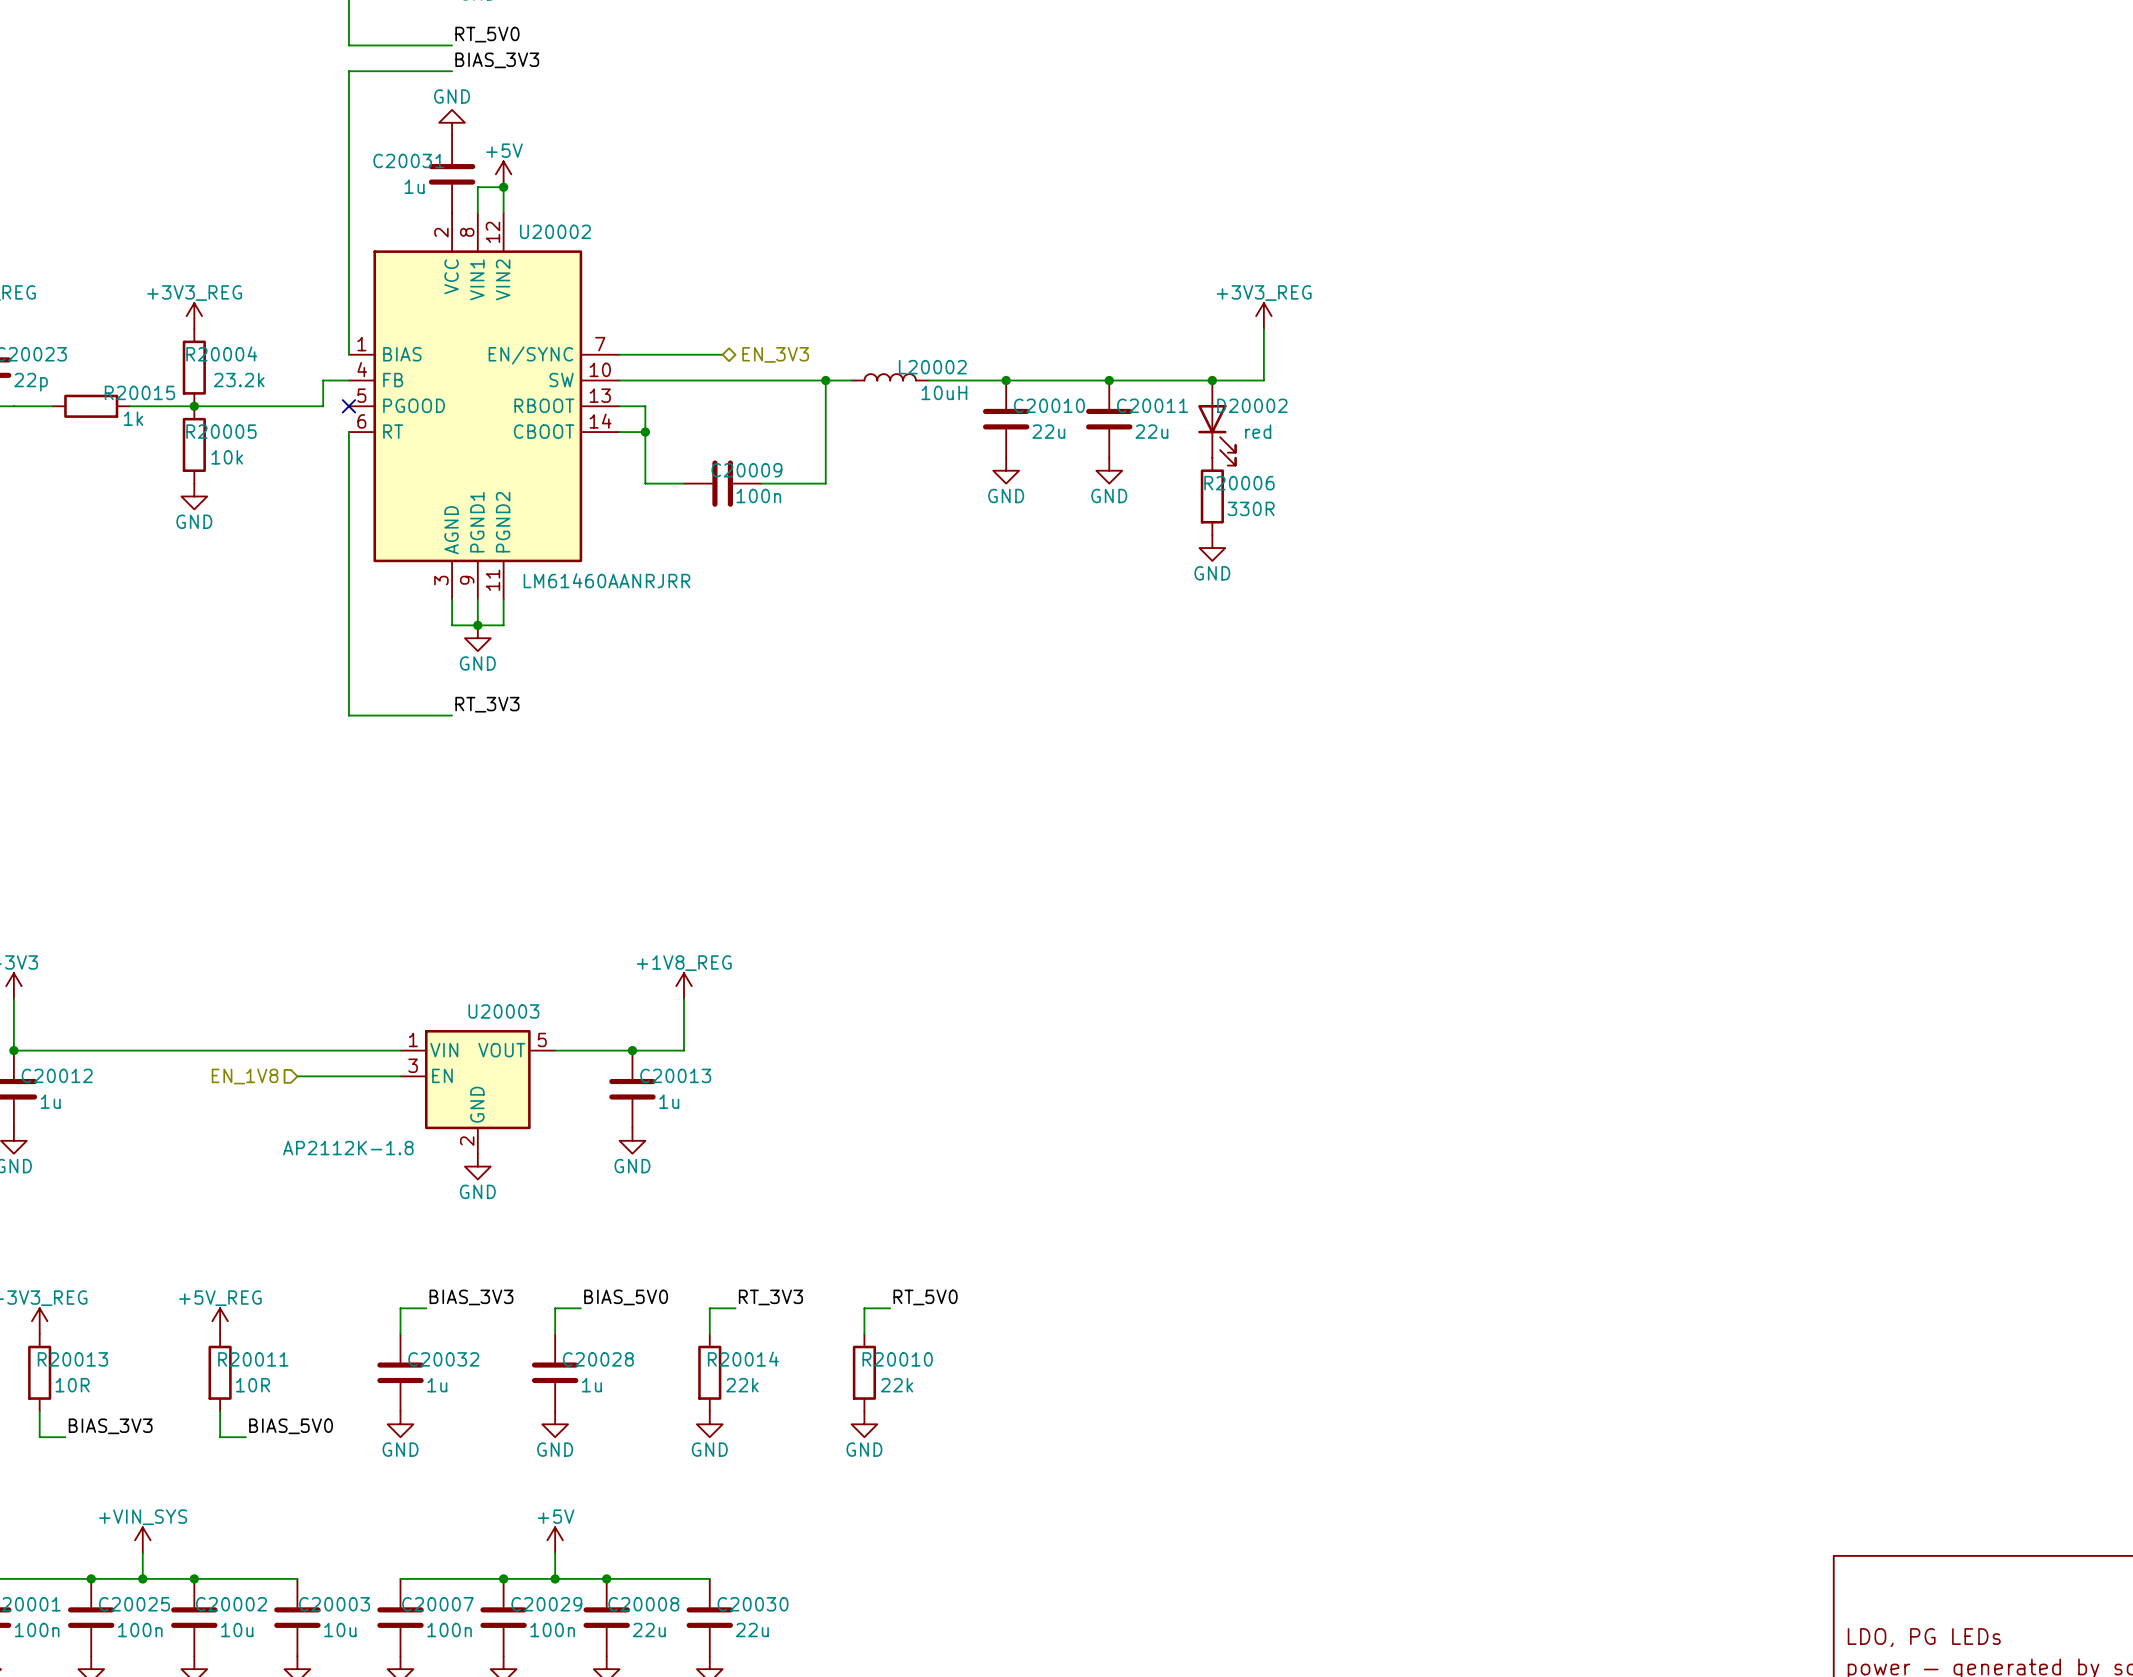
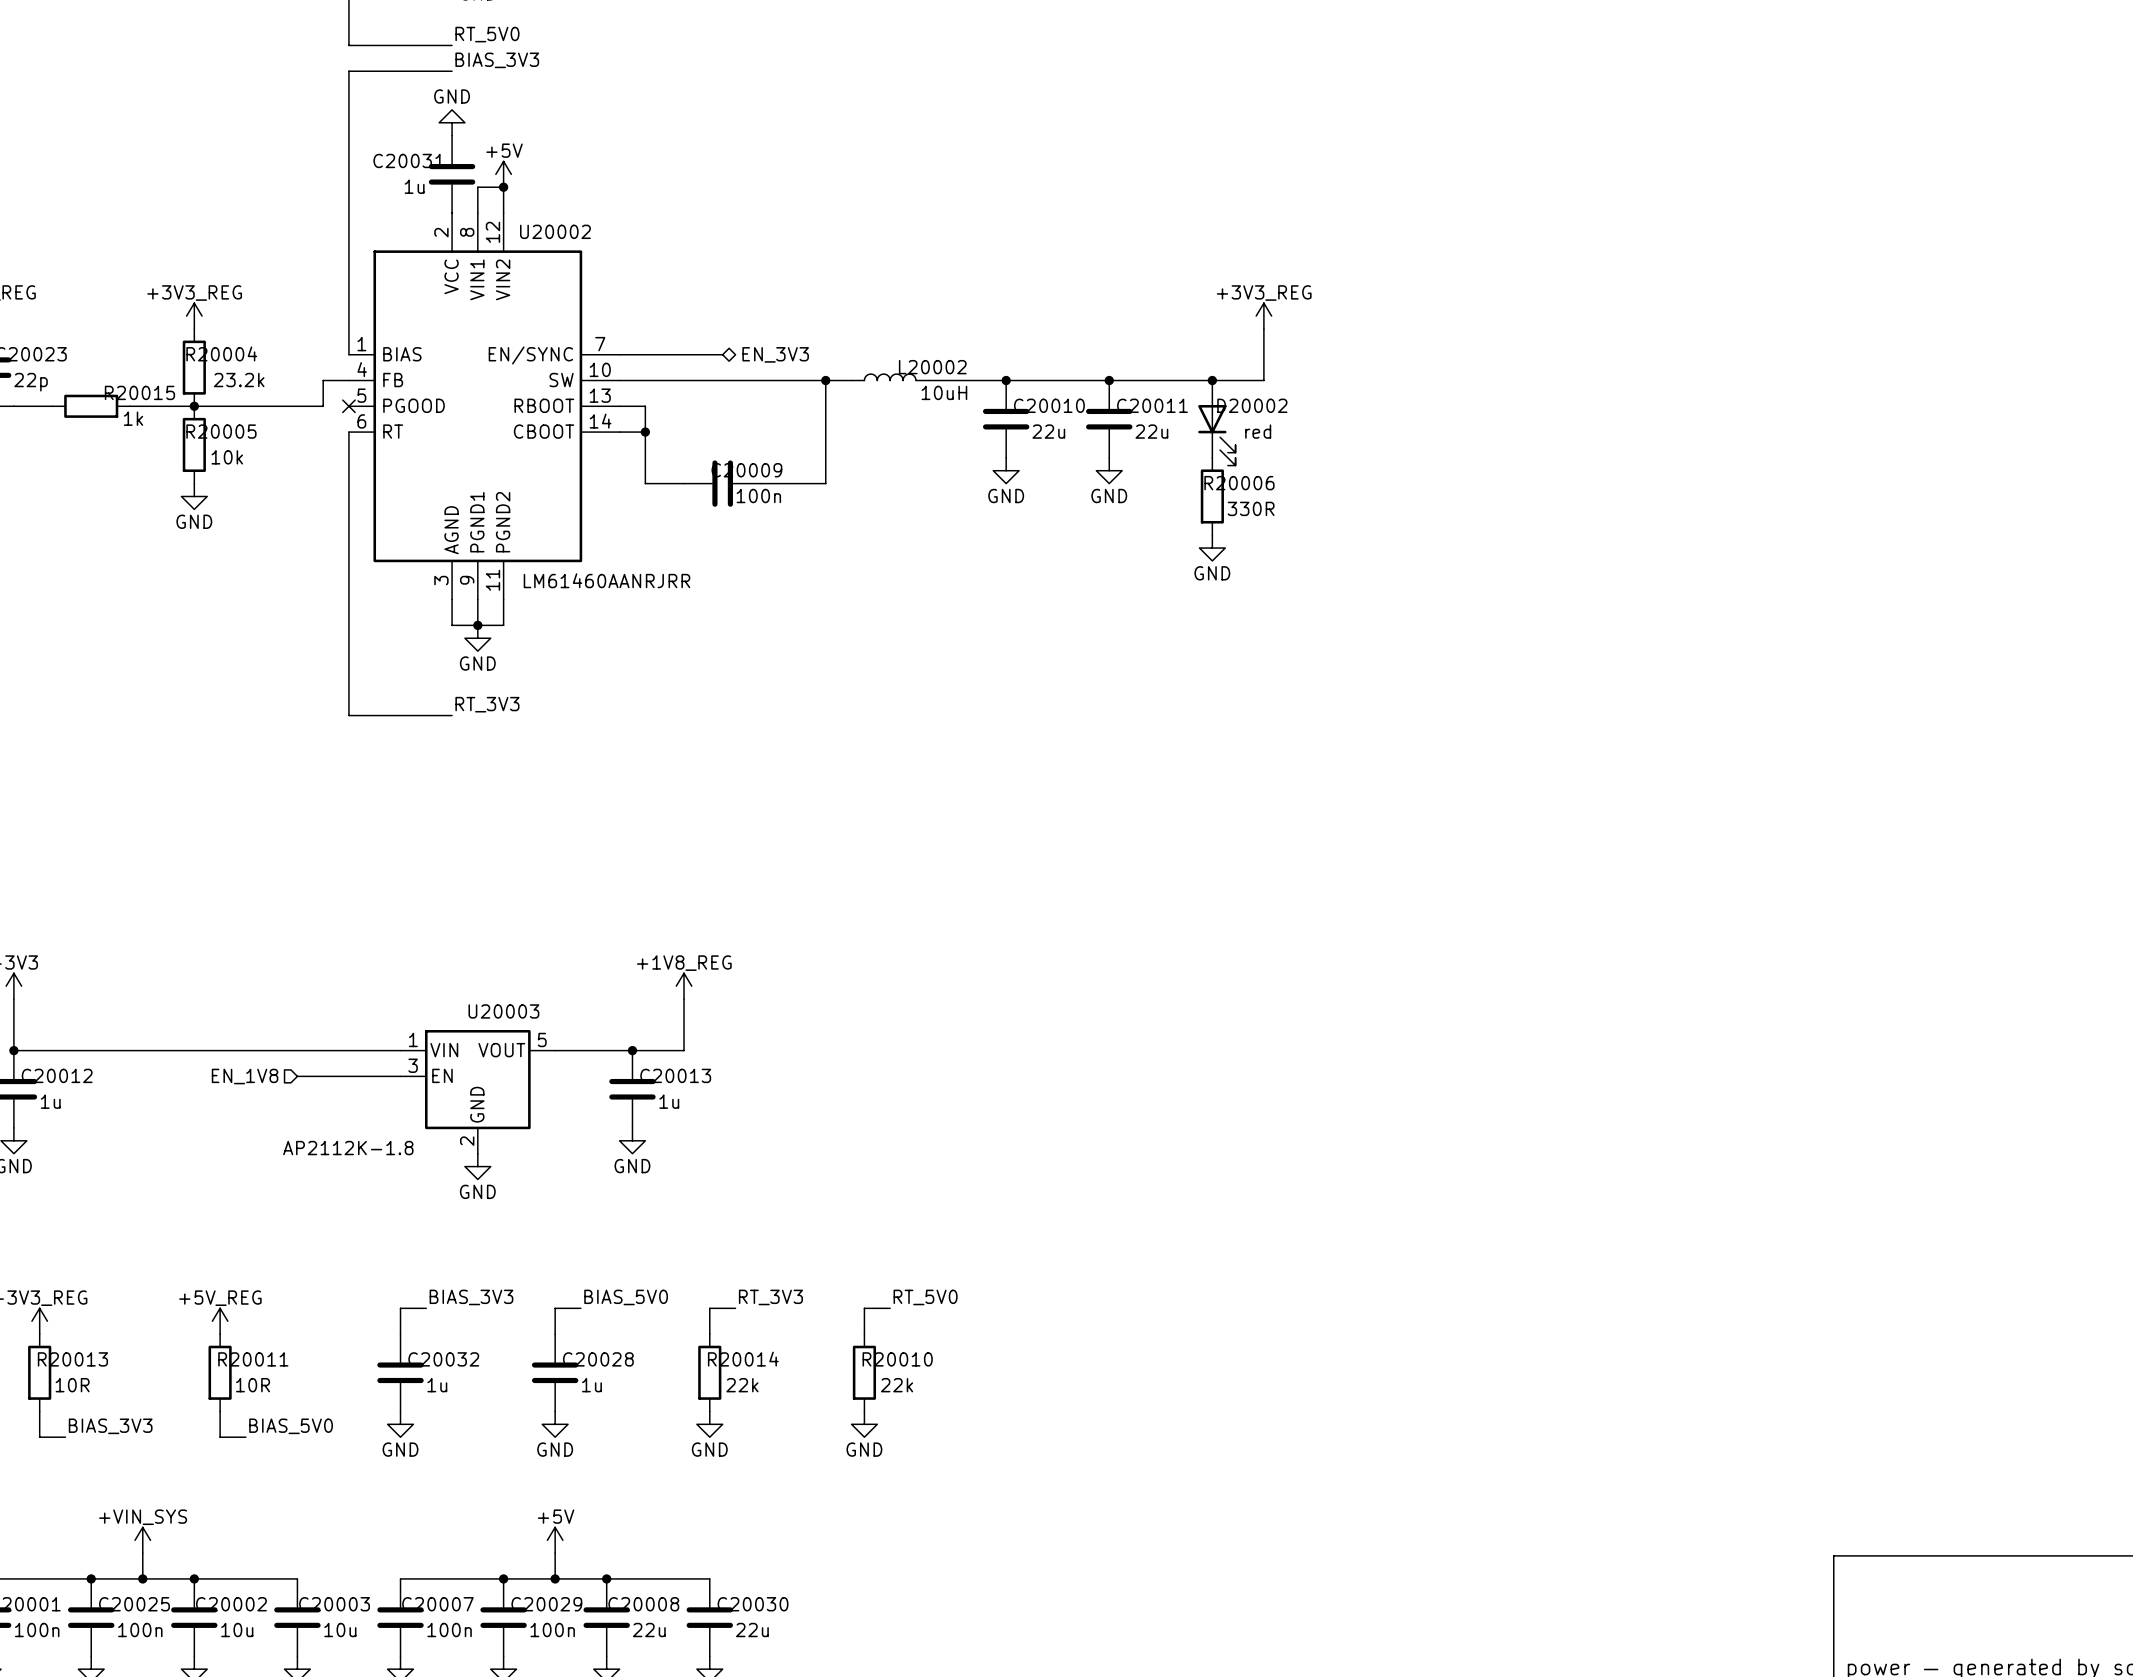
title block: LDO, PG LEDs (1924, 1637) -> none

